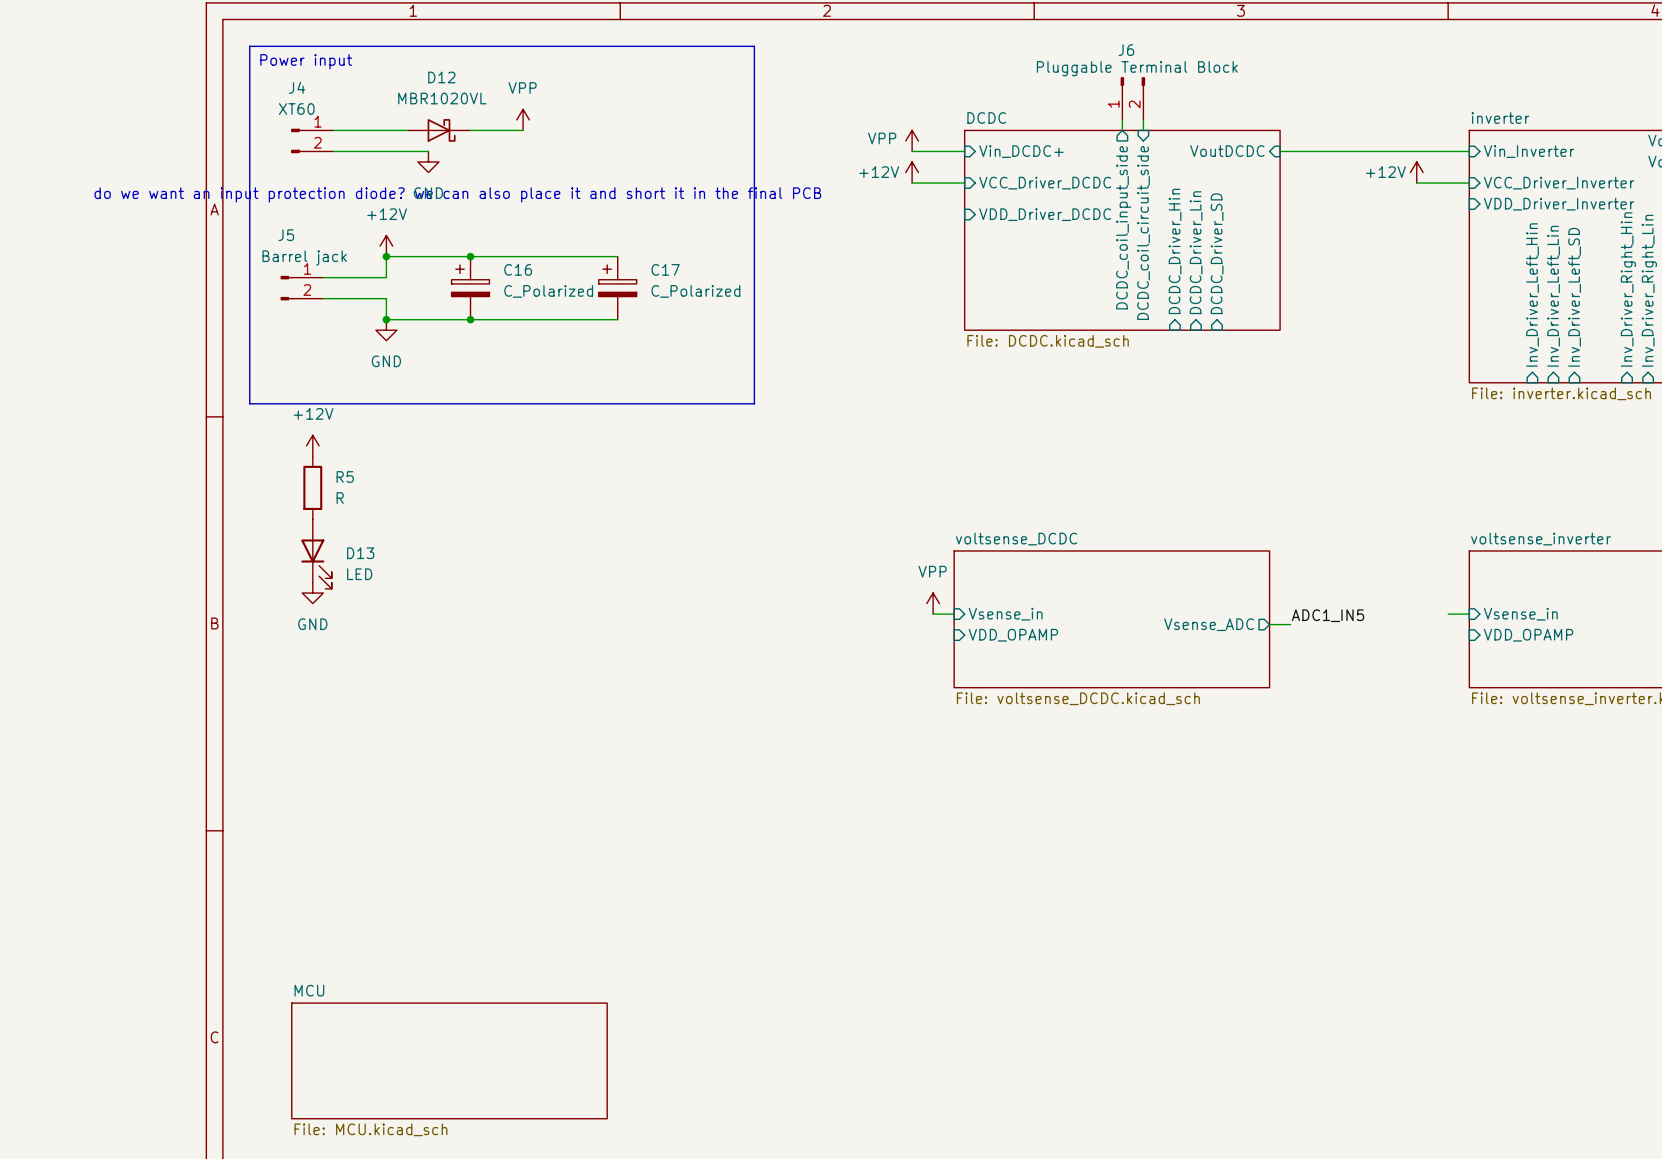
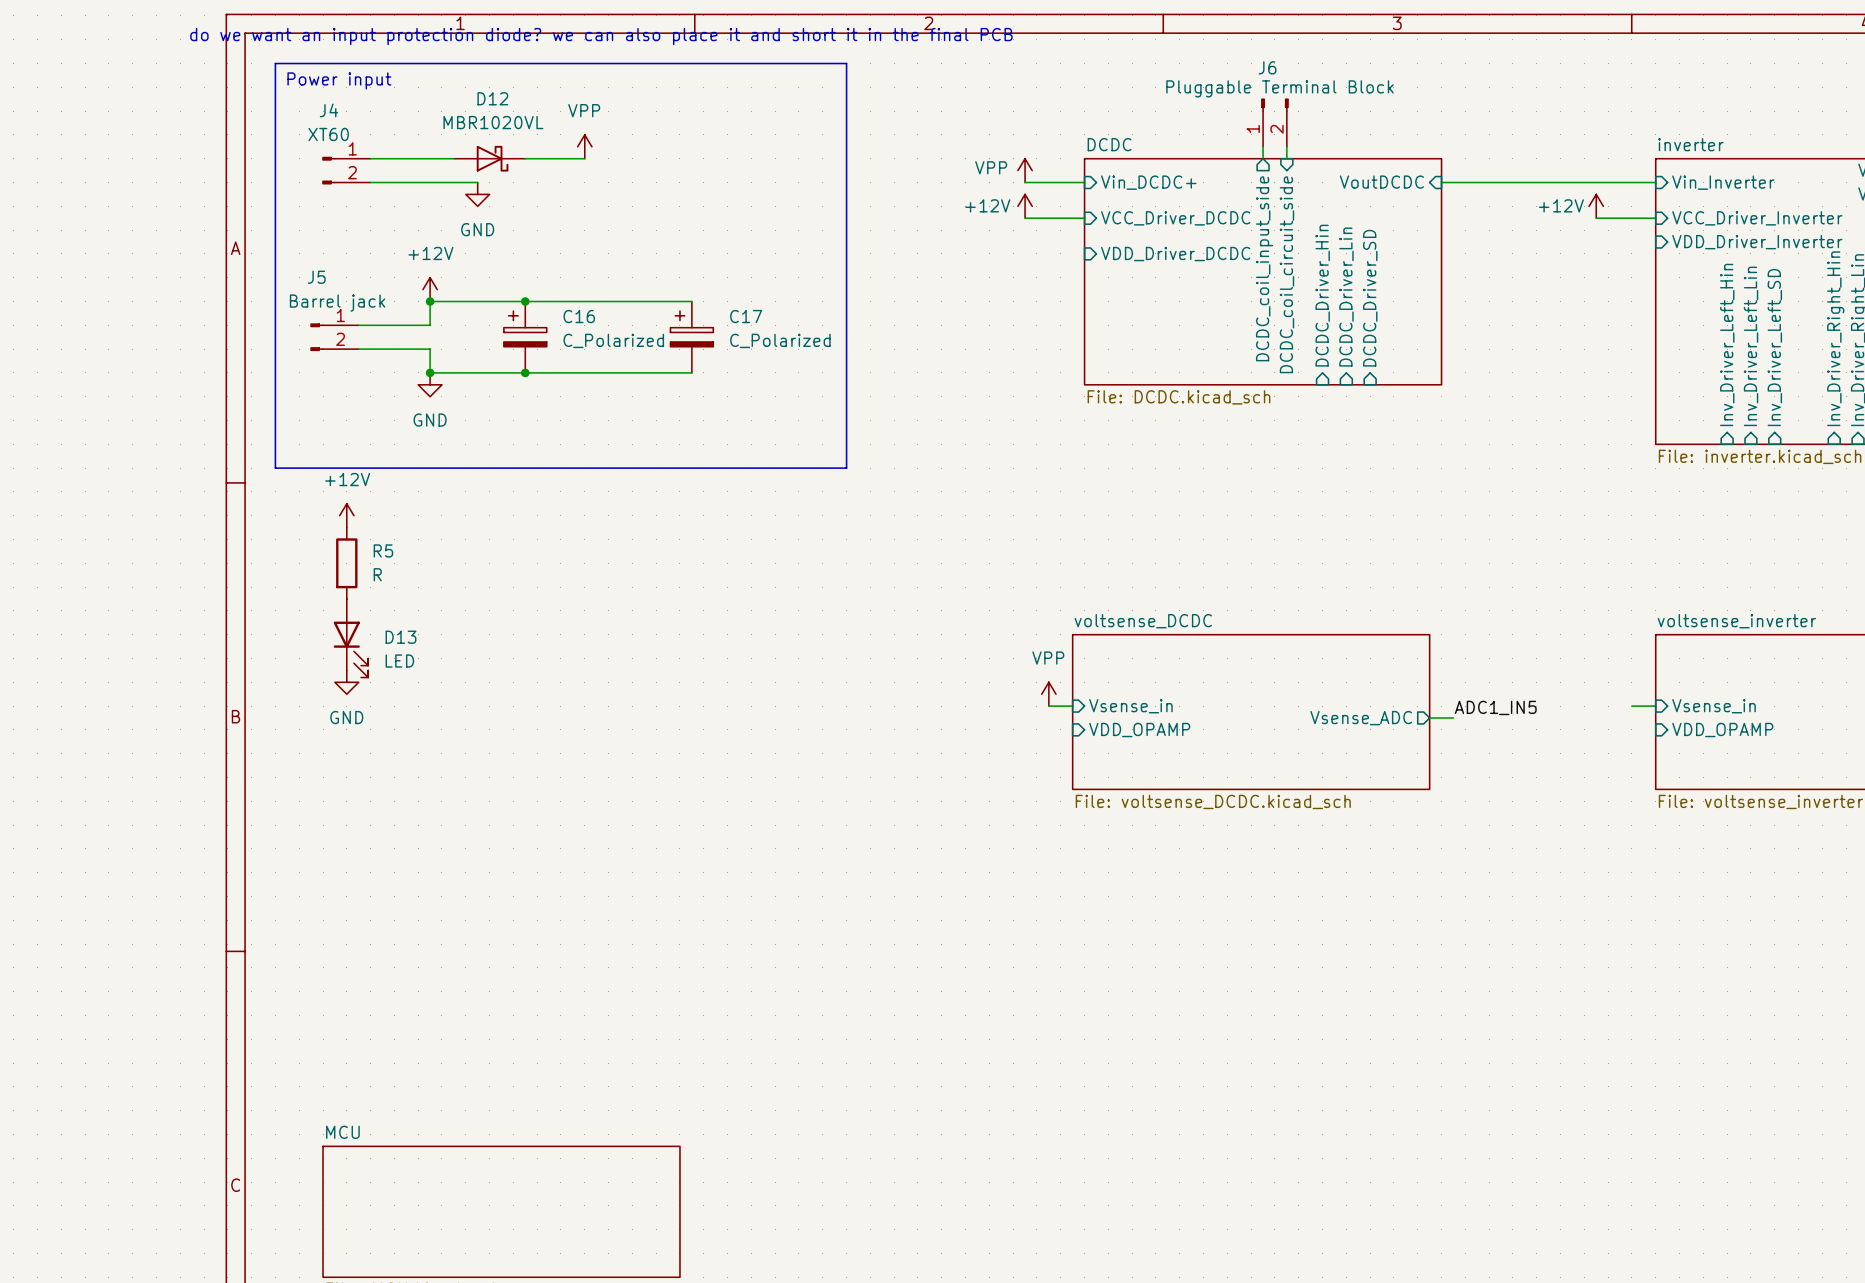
text position: do we want an input protection diode? we can also place it and short it in the final PCB (457, 194) -> do we want an input protection diode? we can also place it and short it in the final PCB (601, 36)

